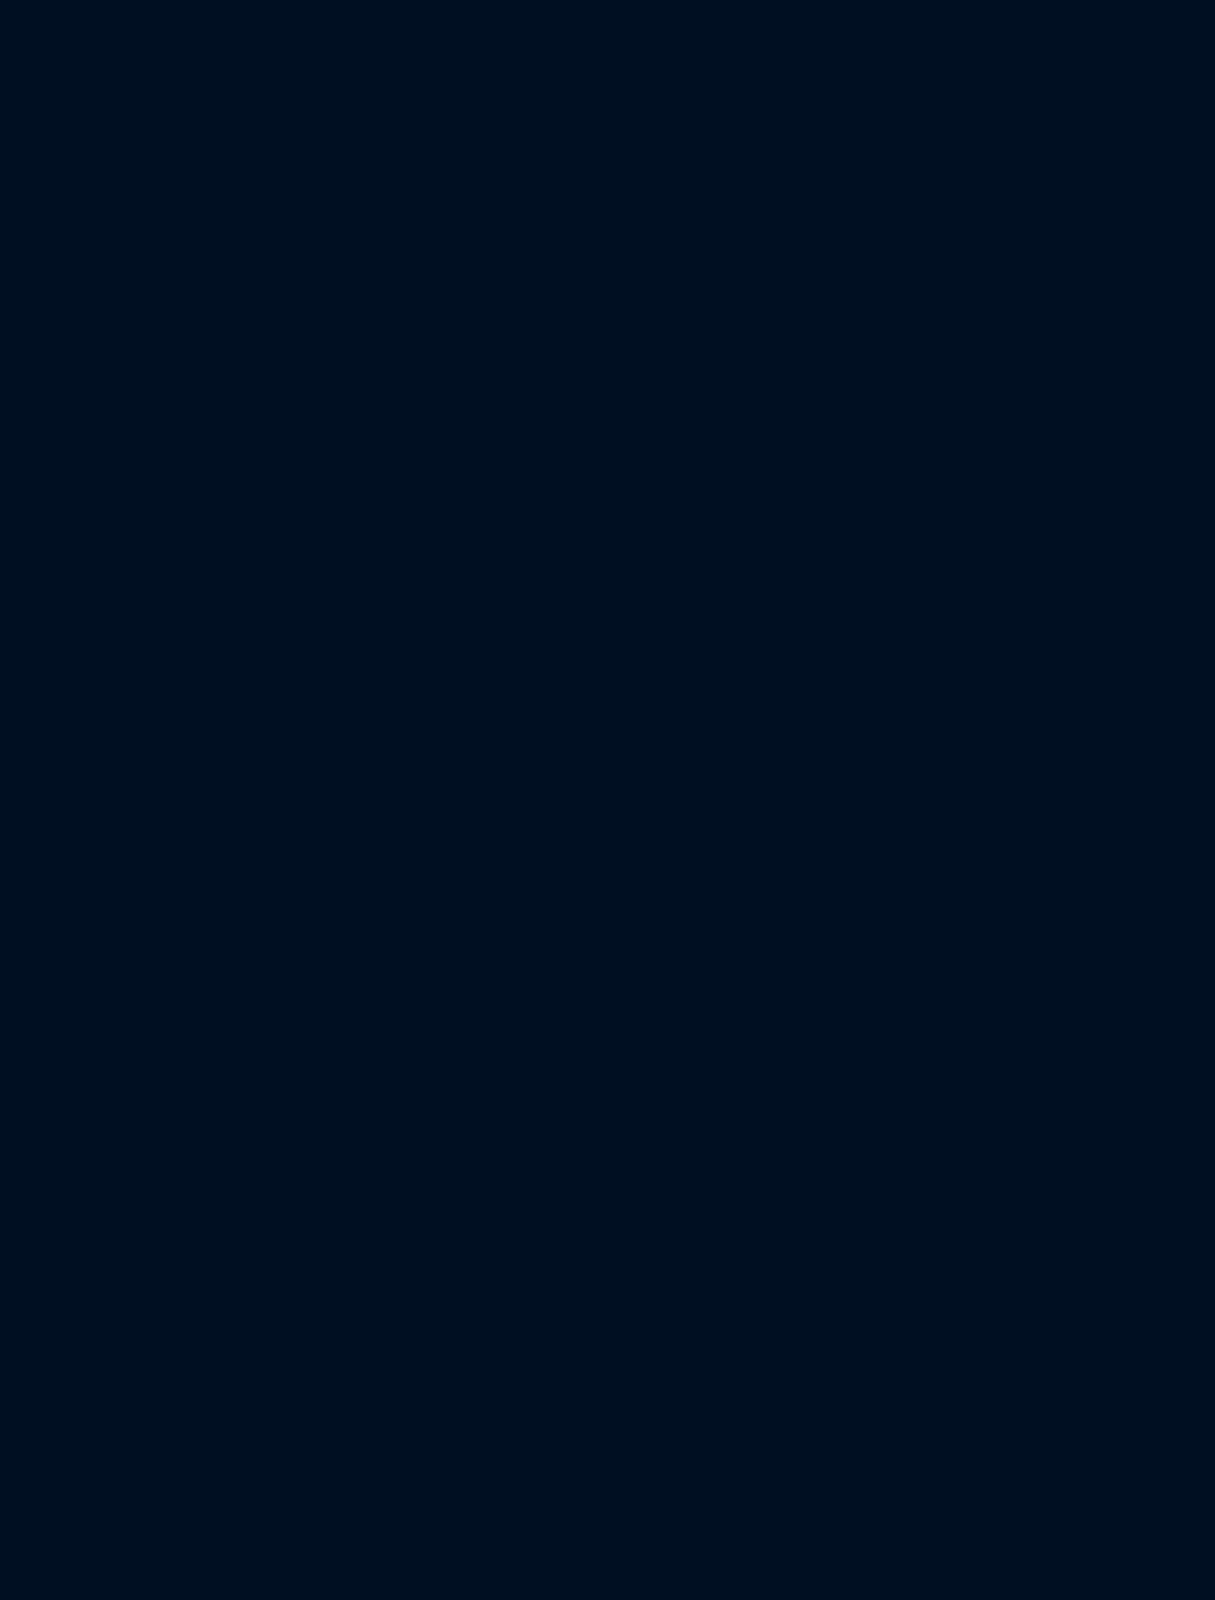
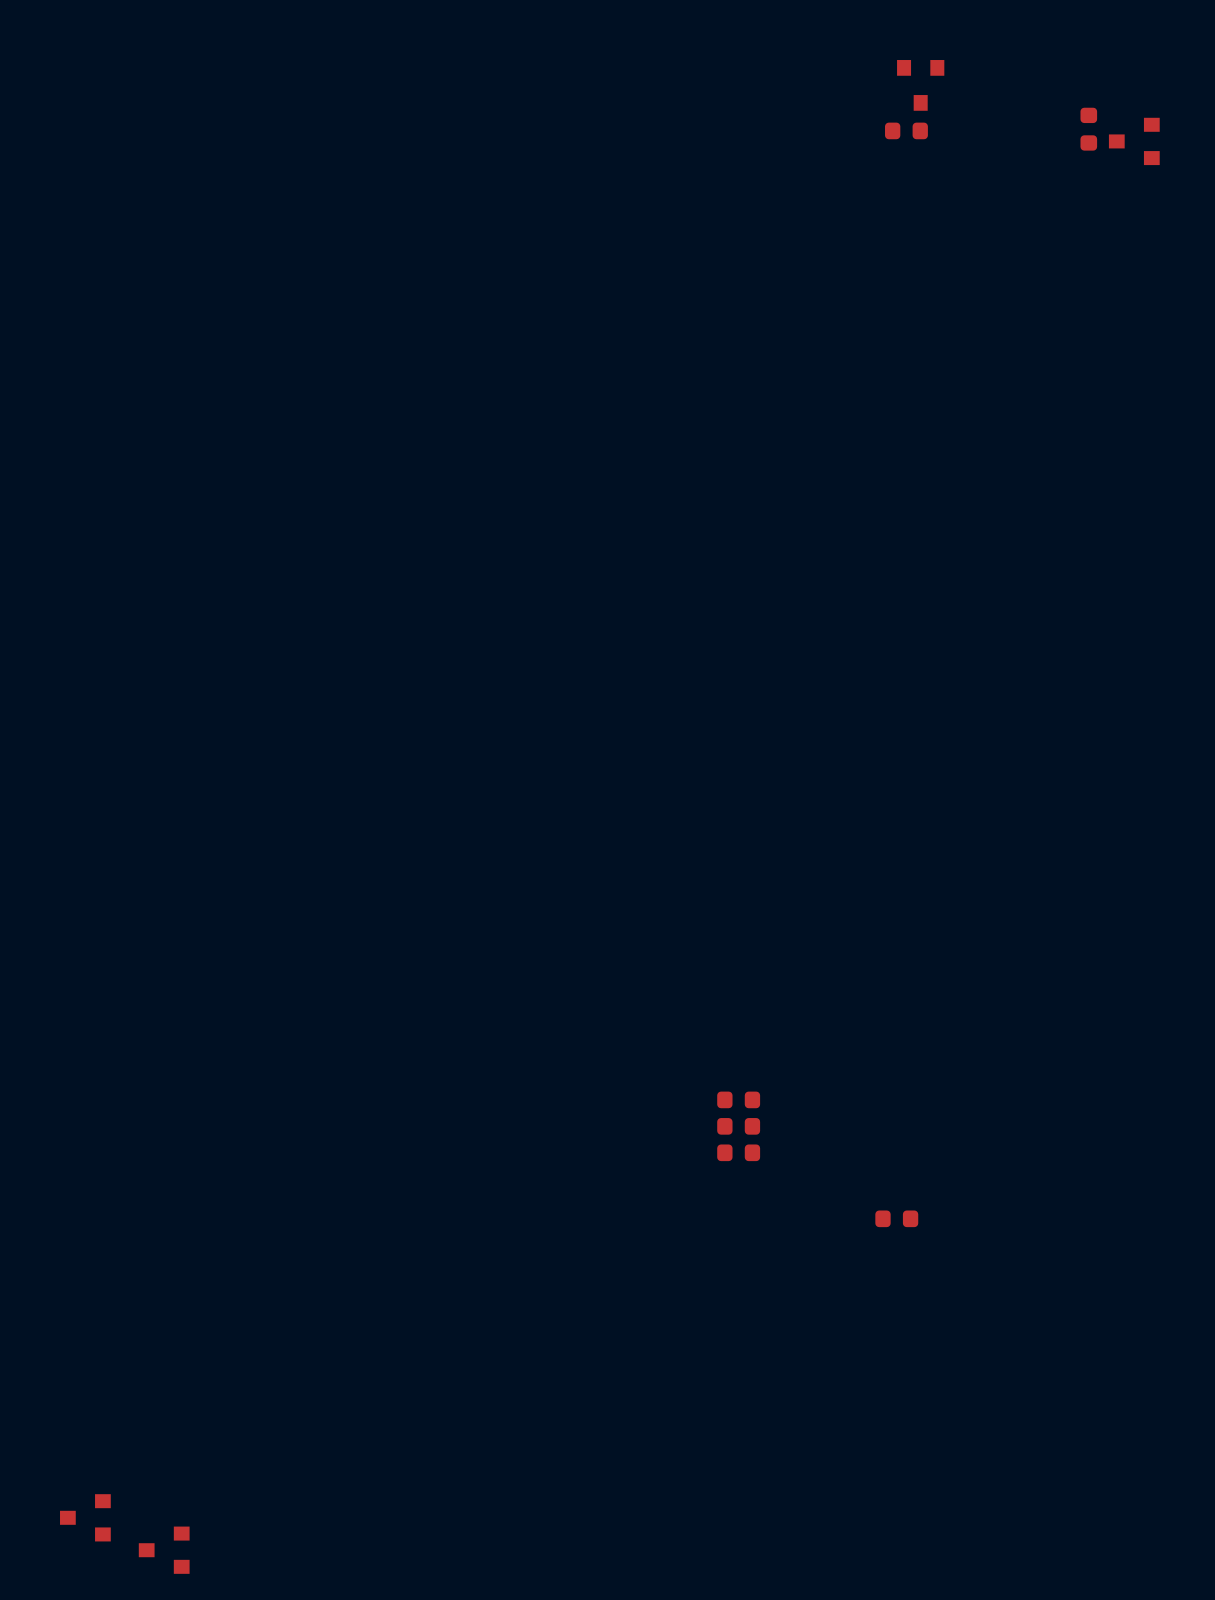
part: none -> (920, 85)
part: none -> (1088, 129)
part: none -> (906, 130)
part: none -> (1134, 141)
part: none -> (738, 1099)
part: none -> (738, 1126)
part: none -> (738, 1152)
part: none -> (896, 1218)
part: none -> (85, 1517)
part: none -> (164, 1550)

